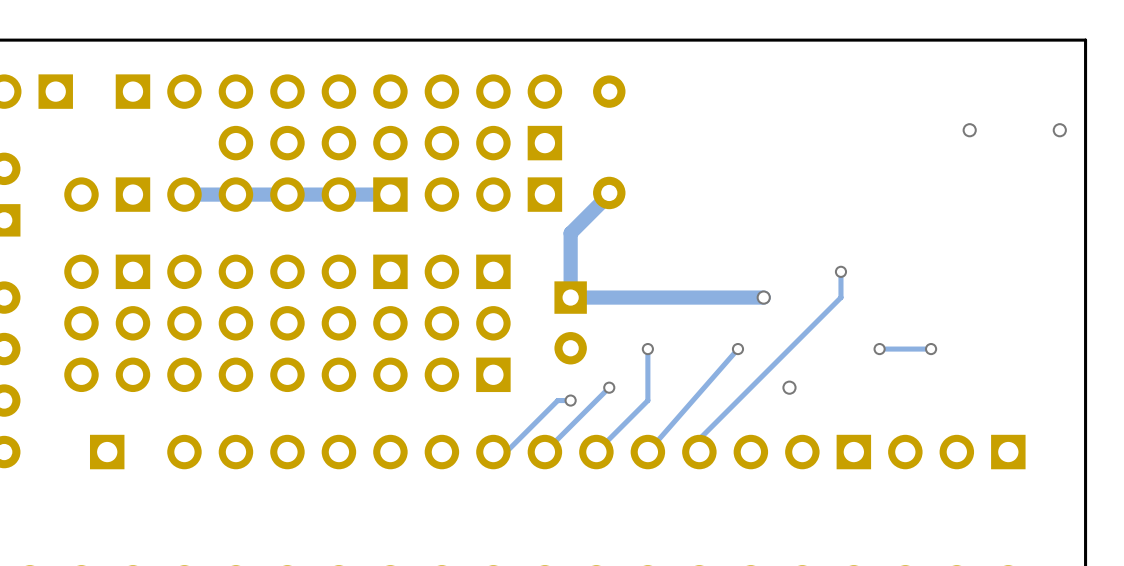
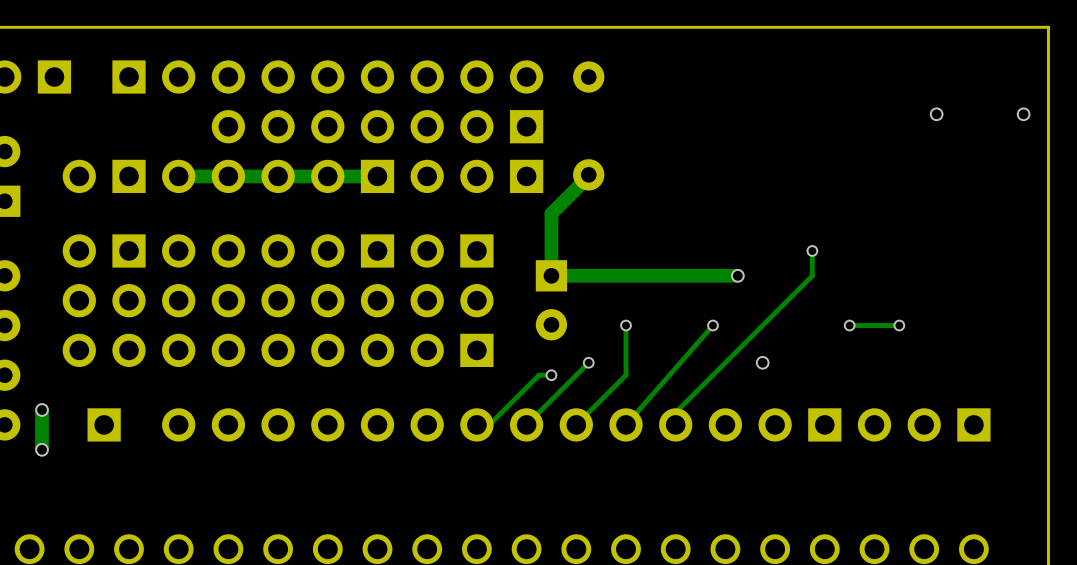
track: none -> (42, 410) (42, 449)
via: none -> (42, 410)
via: none -> (42, 449)

